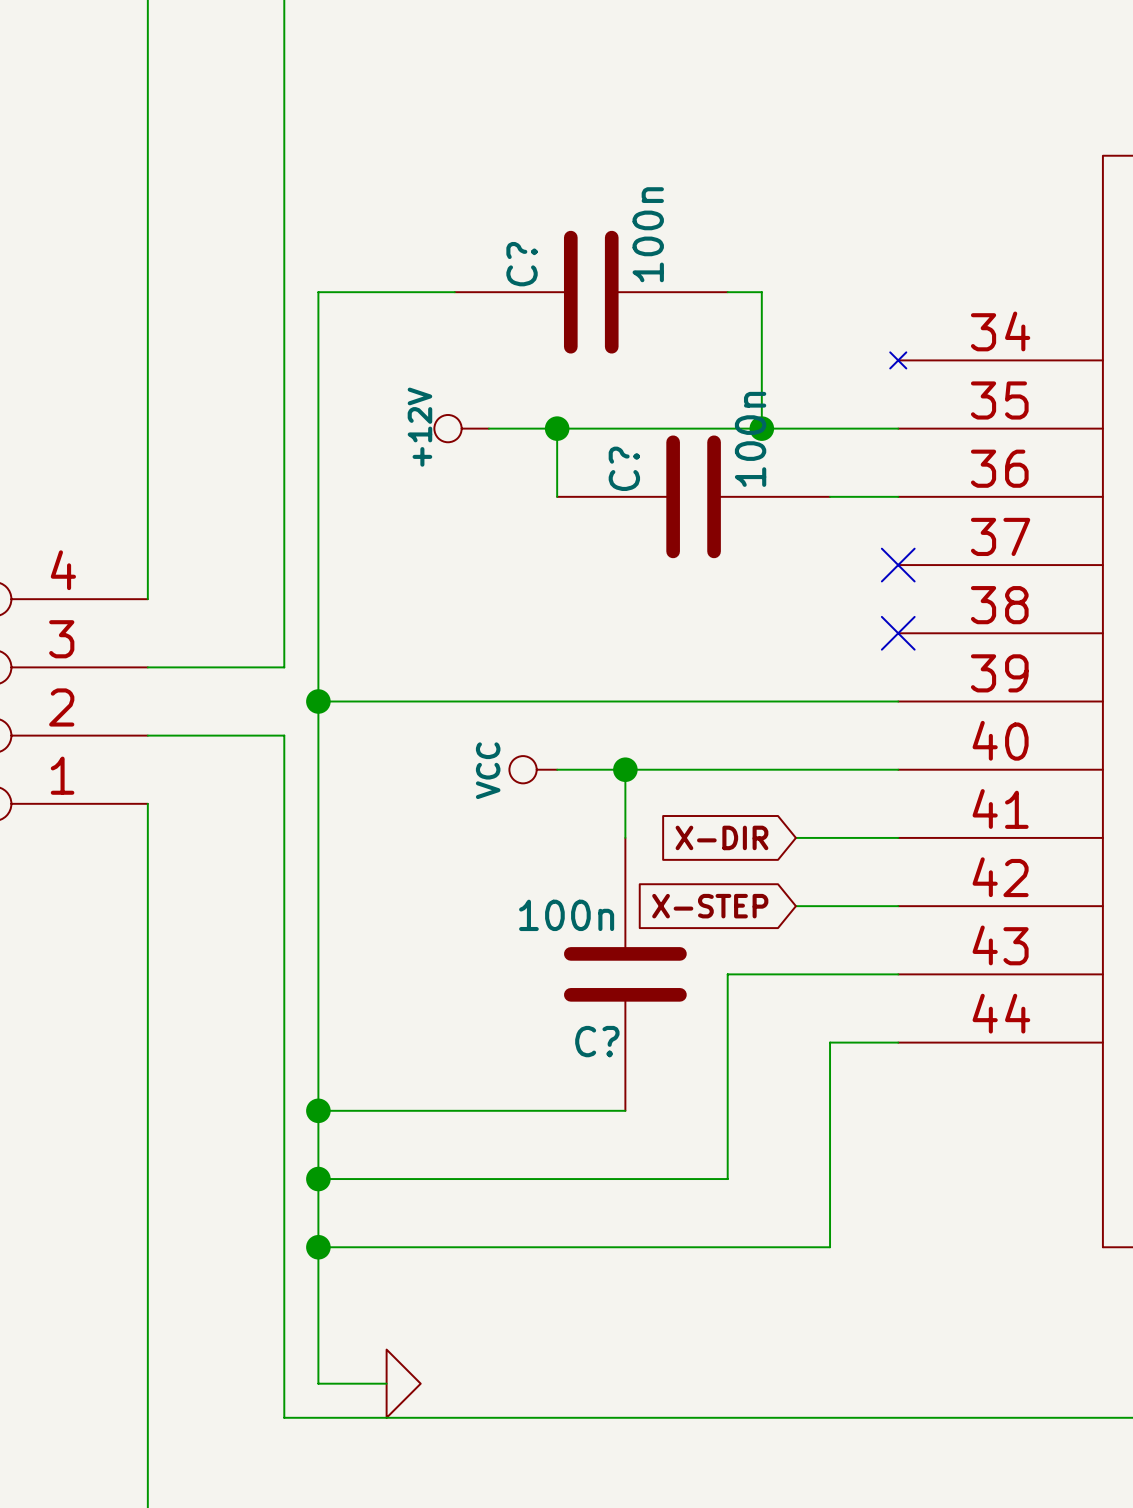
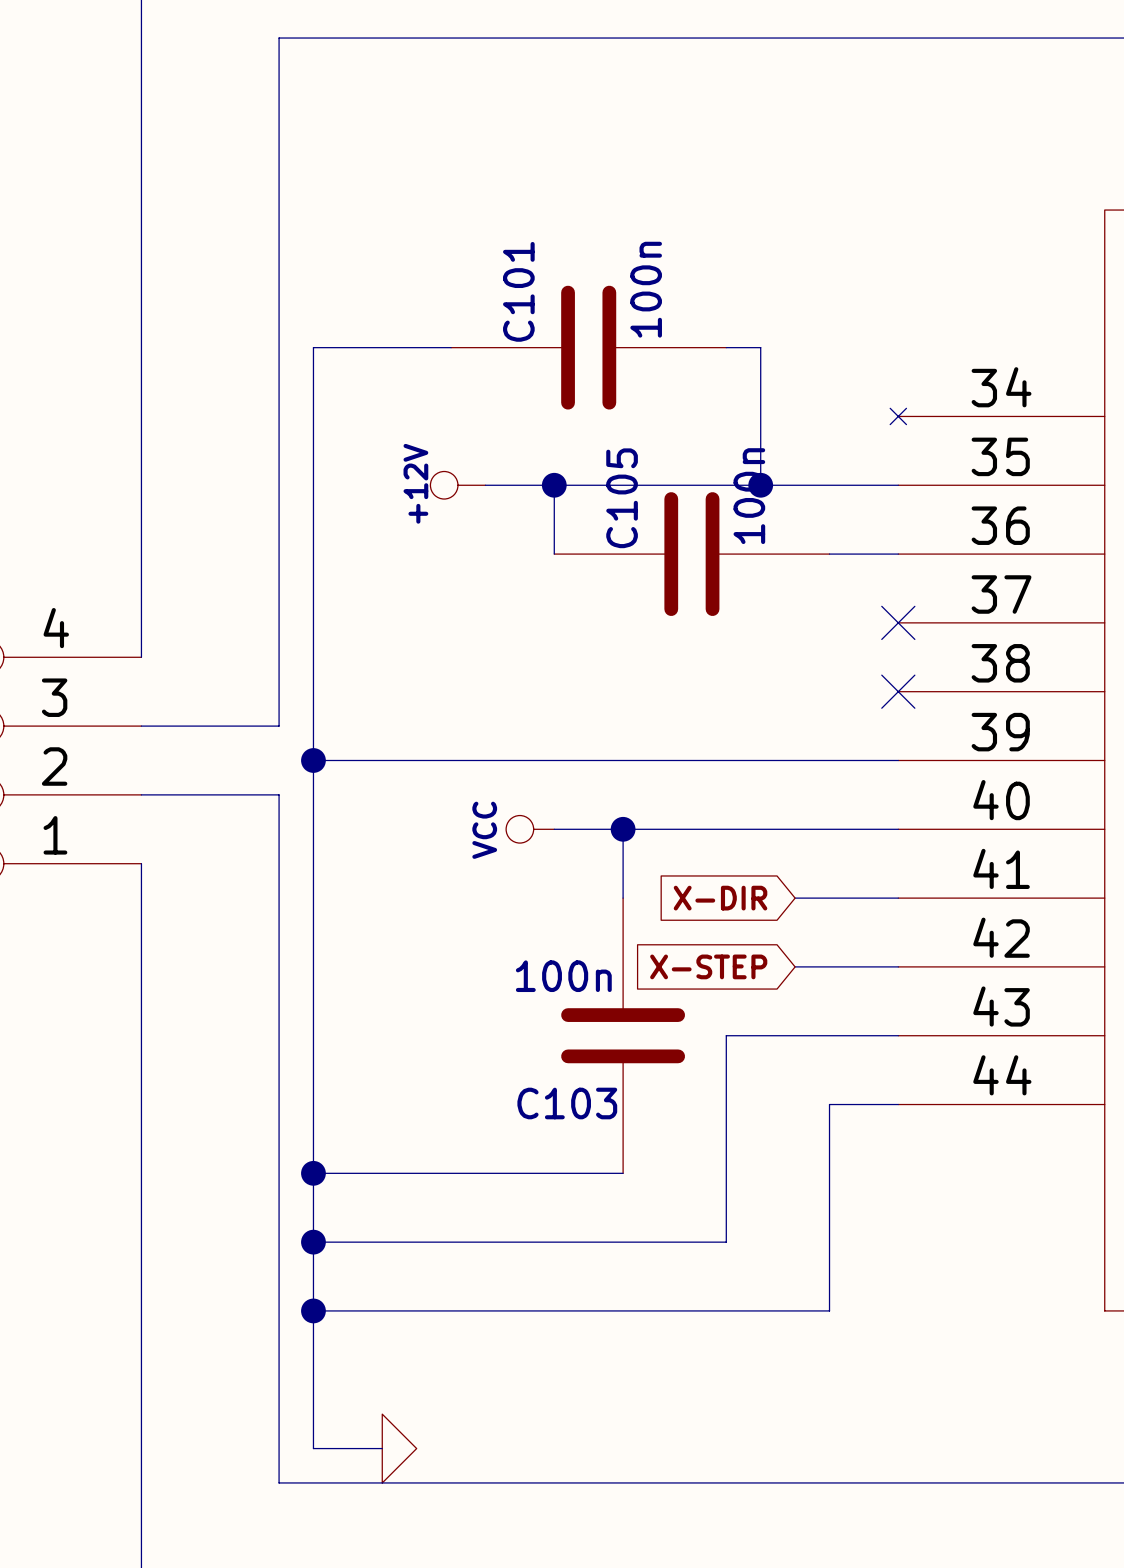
C? name: C? (522, 264) -> C101 (518, 291)
C? name: C? (624, 468) -> C105 (622, 498)
C? name: C? (597, 1041) -> C103 (567, 1103)

